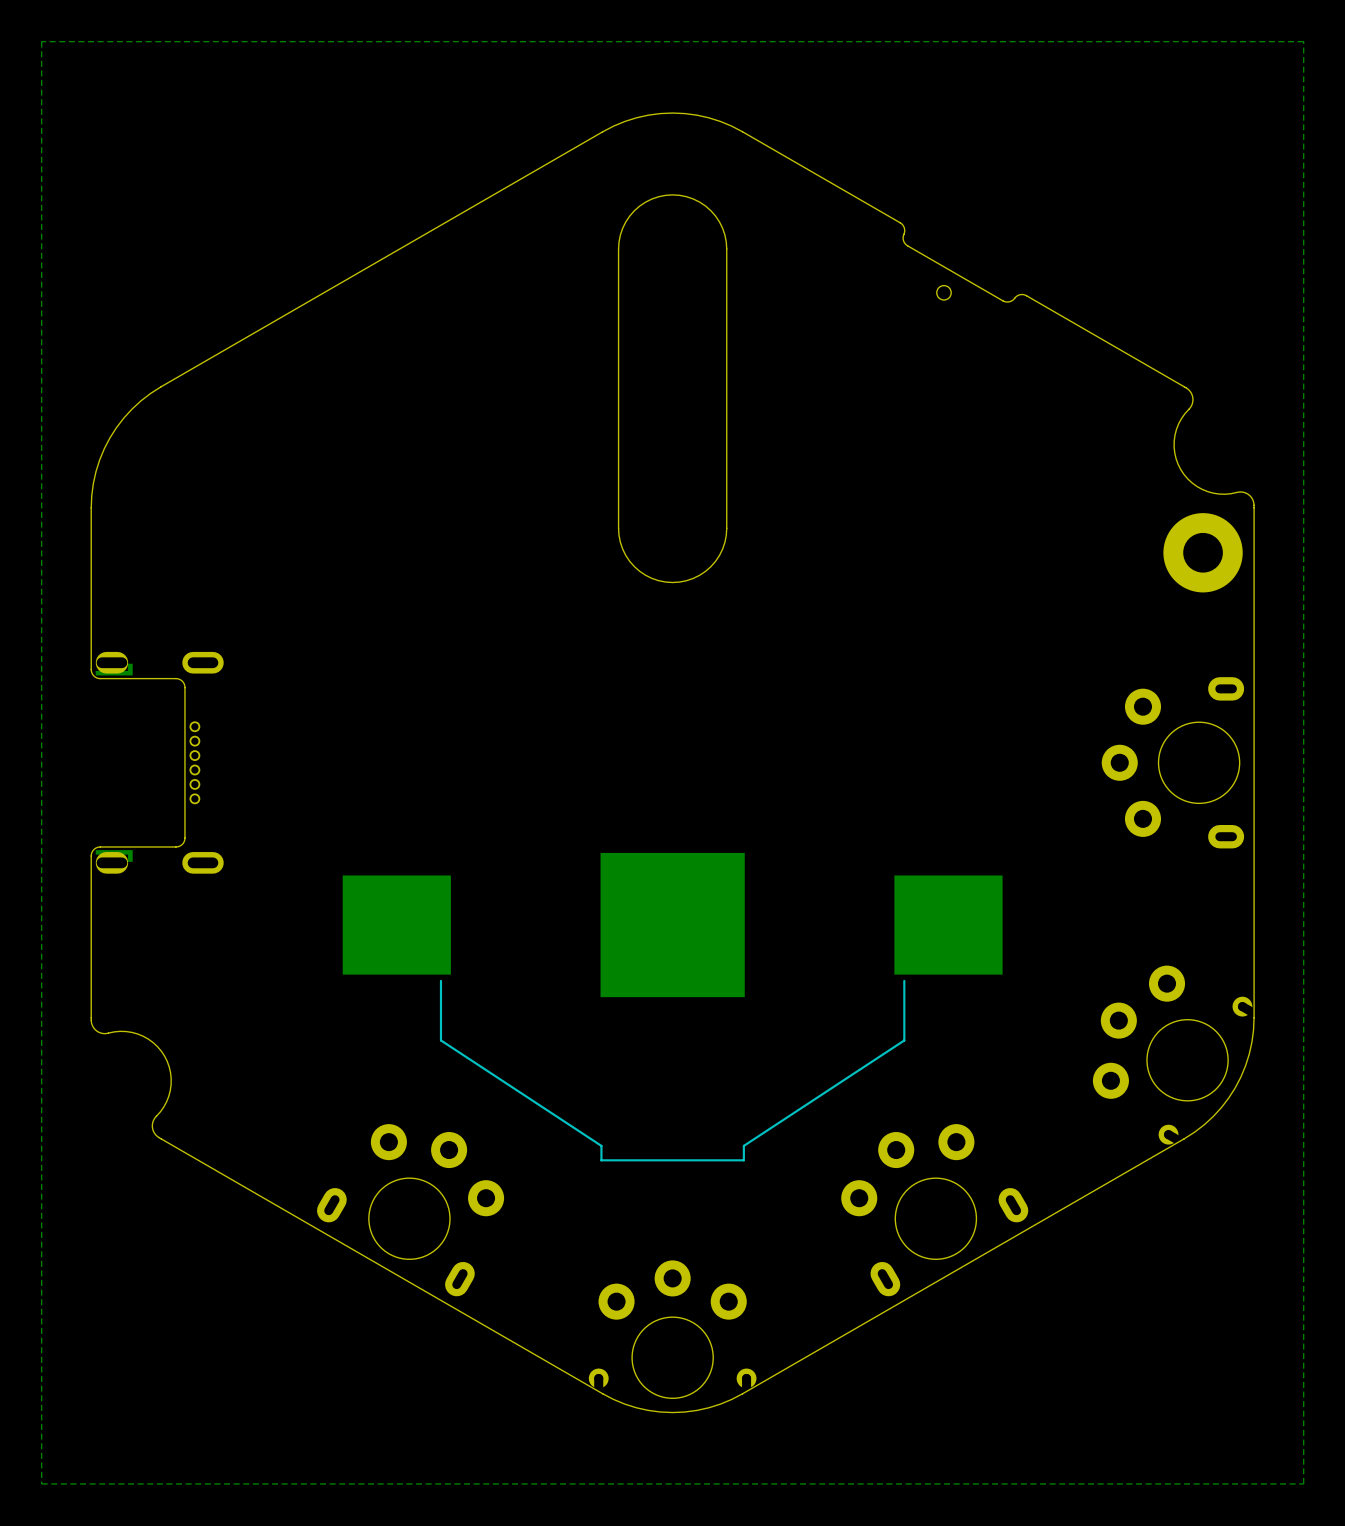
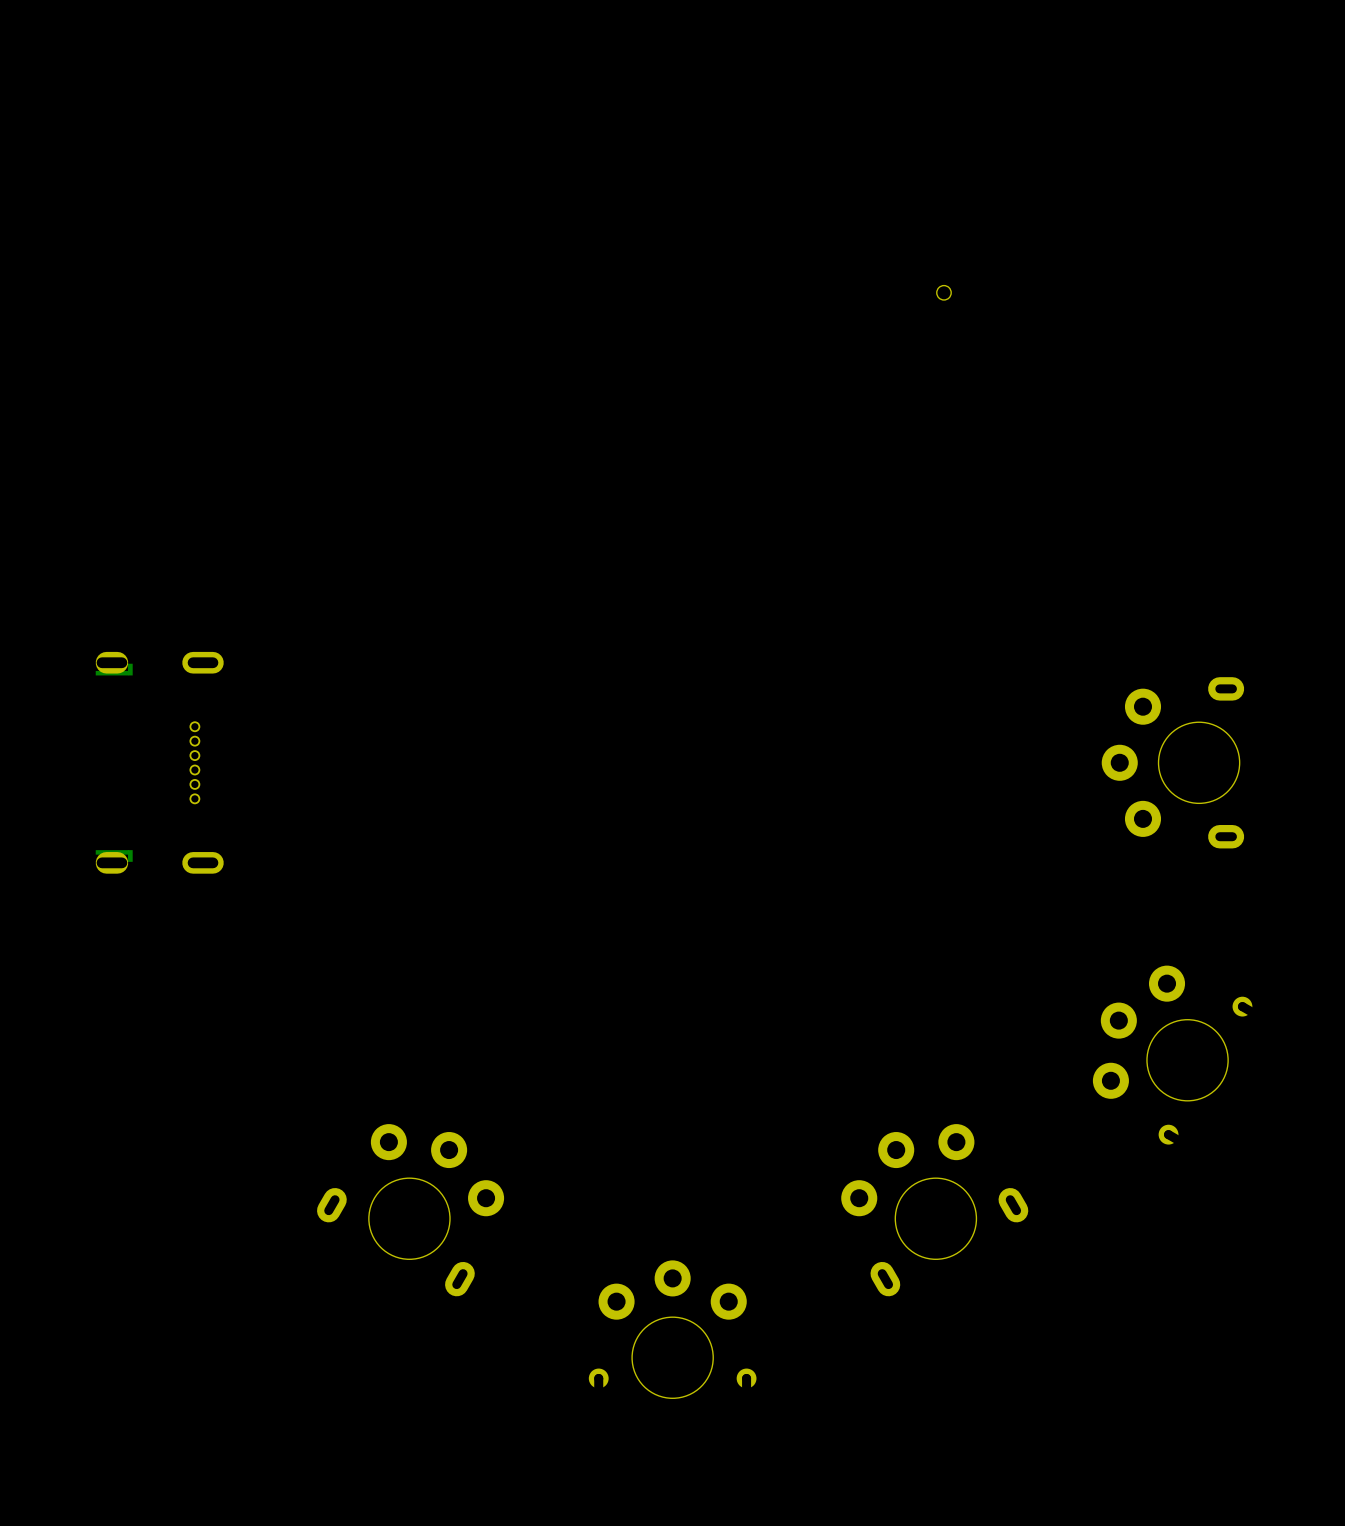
zone outline: (1303, 41) (41, 41) (41, 1483) (1303, 1483) (1303, 41) -> none
board edge: (726, 248) (726, 535) (719, 555) (705, 571) (686, 580) (665, 582) (651, 578) (634, 566) (622, 549) (619, 535) (619, 241) (625, 221) (639, 206) (658, 196) (679, 195) (699, 202) (715, 216) (722, 228) (726, 248) -> none
board edge: (1026, 295) (1187, 389) (1192, 396) (1192, 403) (1178, 423) (1174, 440) (1176, 458) (1180, 469) (1192, 482) (1202, 489) (1219, 494) (1243, 492) (1249, 495) (1253, 501) (1253, 1029) (1249, 1053) (1240, 1076) (1228, 1097) (1213, 1116) (1184, 1138) (742, 1393) (708, 1407) (672, 1412) (636, 1407) (602, 1393) (156, 1135) (152, 1129) (152, 1122) (166, 1101) (171, 1084) (169, 1067) (164, 1056) (157, 1046) (143, 1036) (126, 1031) (101, 1033) (94, 1028) (91, 1020) (92, 851) (100, 846) (177, 846) (182, 844) (184, 839) (183, 683) (175, 678) (99, 678) (93, 675) (91, 670) (91, 507) (93, 483) (99, 459) (109, 437) (132, 408) (161, 386) (602, 131) (624, 121) (660, 113) (696, 115) (731, 126) (900, 222) (904, 227) (903, 239) (906, 245) (1002, 300) (1009, 301) (1019, 295) (1026, 295) -> none
part: (1203, 552) -> none
part: (672, 1007) -> none

